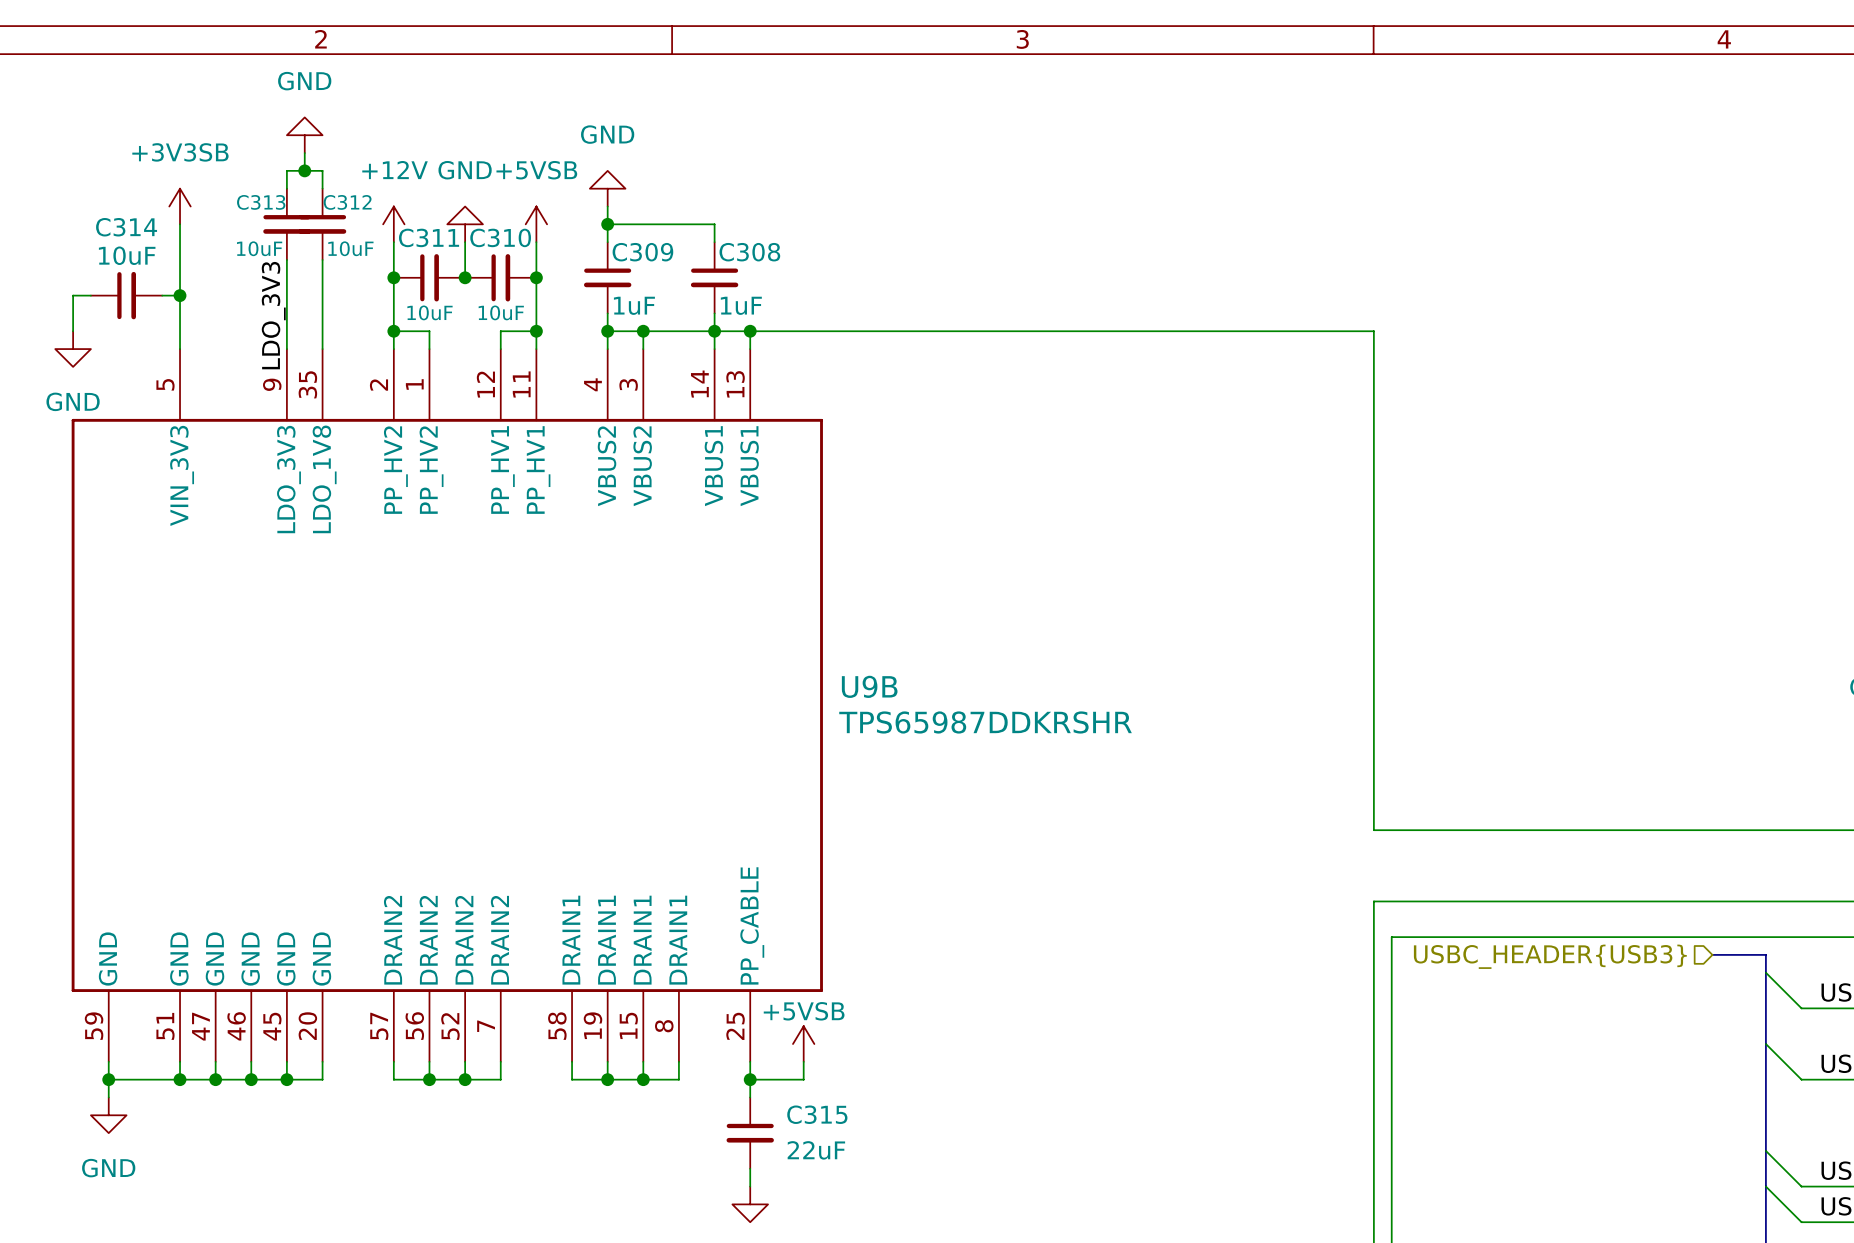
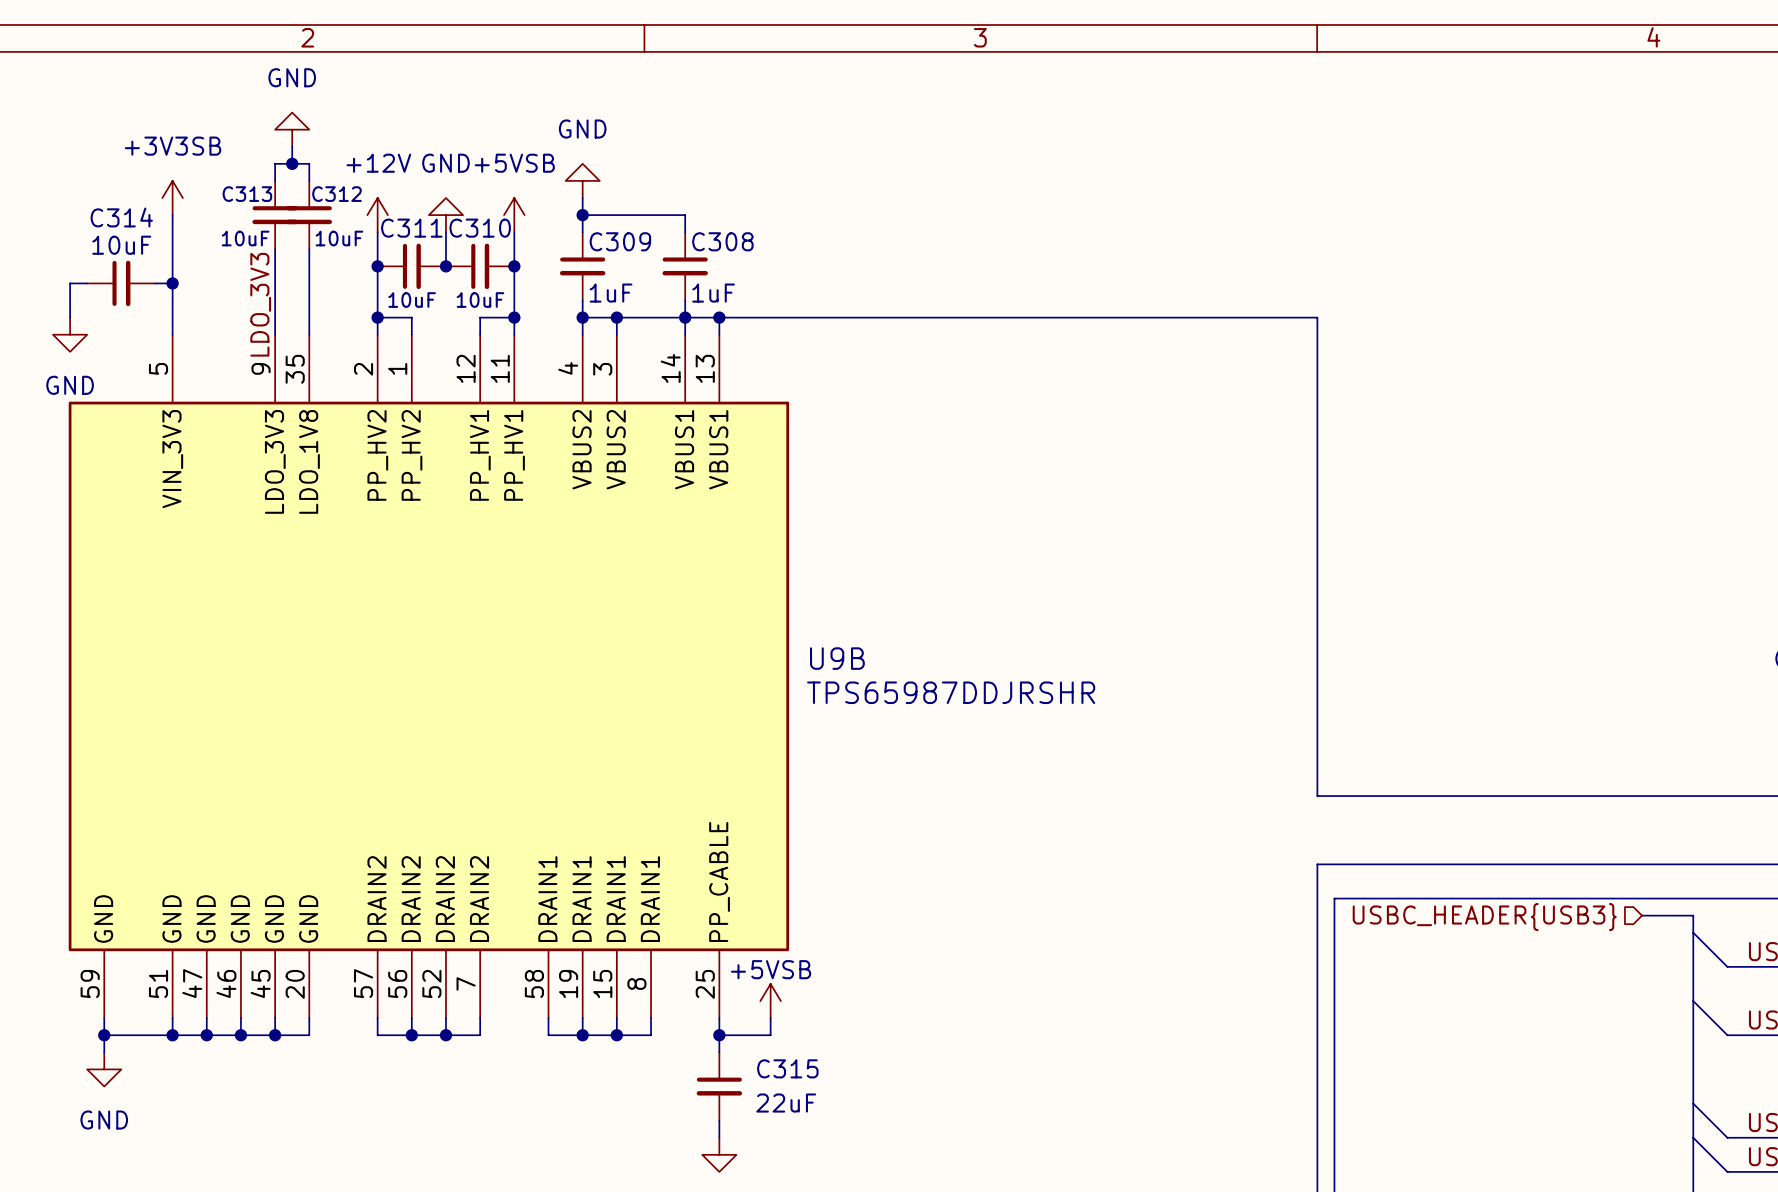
U9B symbol: [71, 349, 823, 1062] -> [68, 334, 790, 1019]
U9B value: TPS65987DDKRSHR (985, 722) -> TPS65987DDJRSHR (951, 692)

